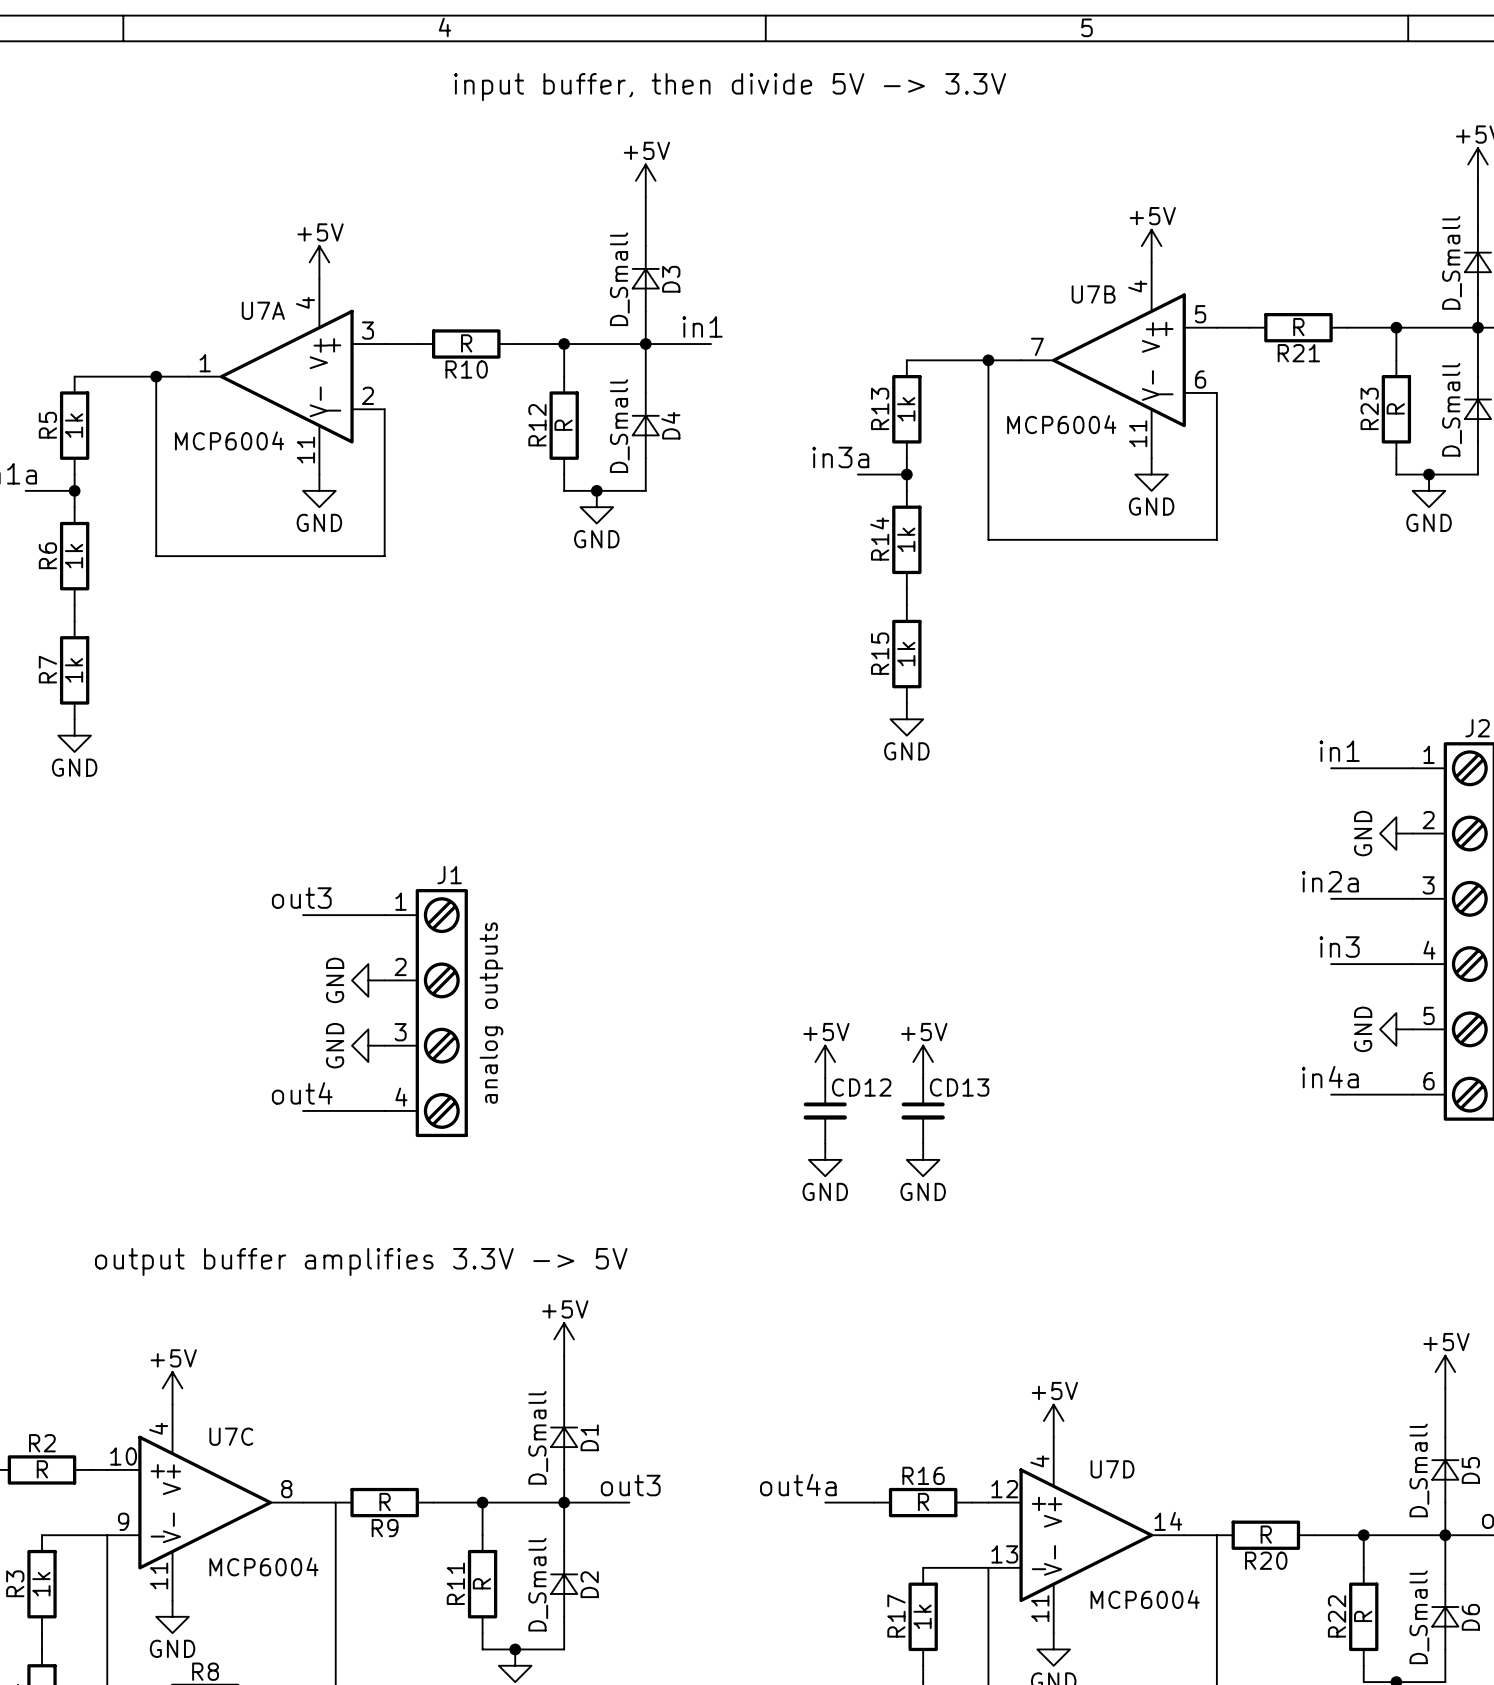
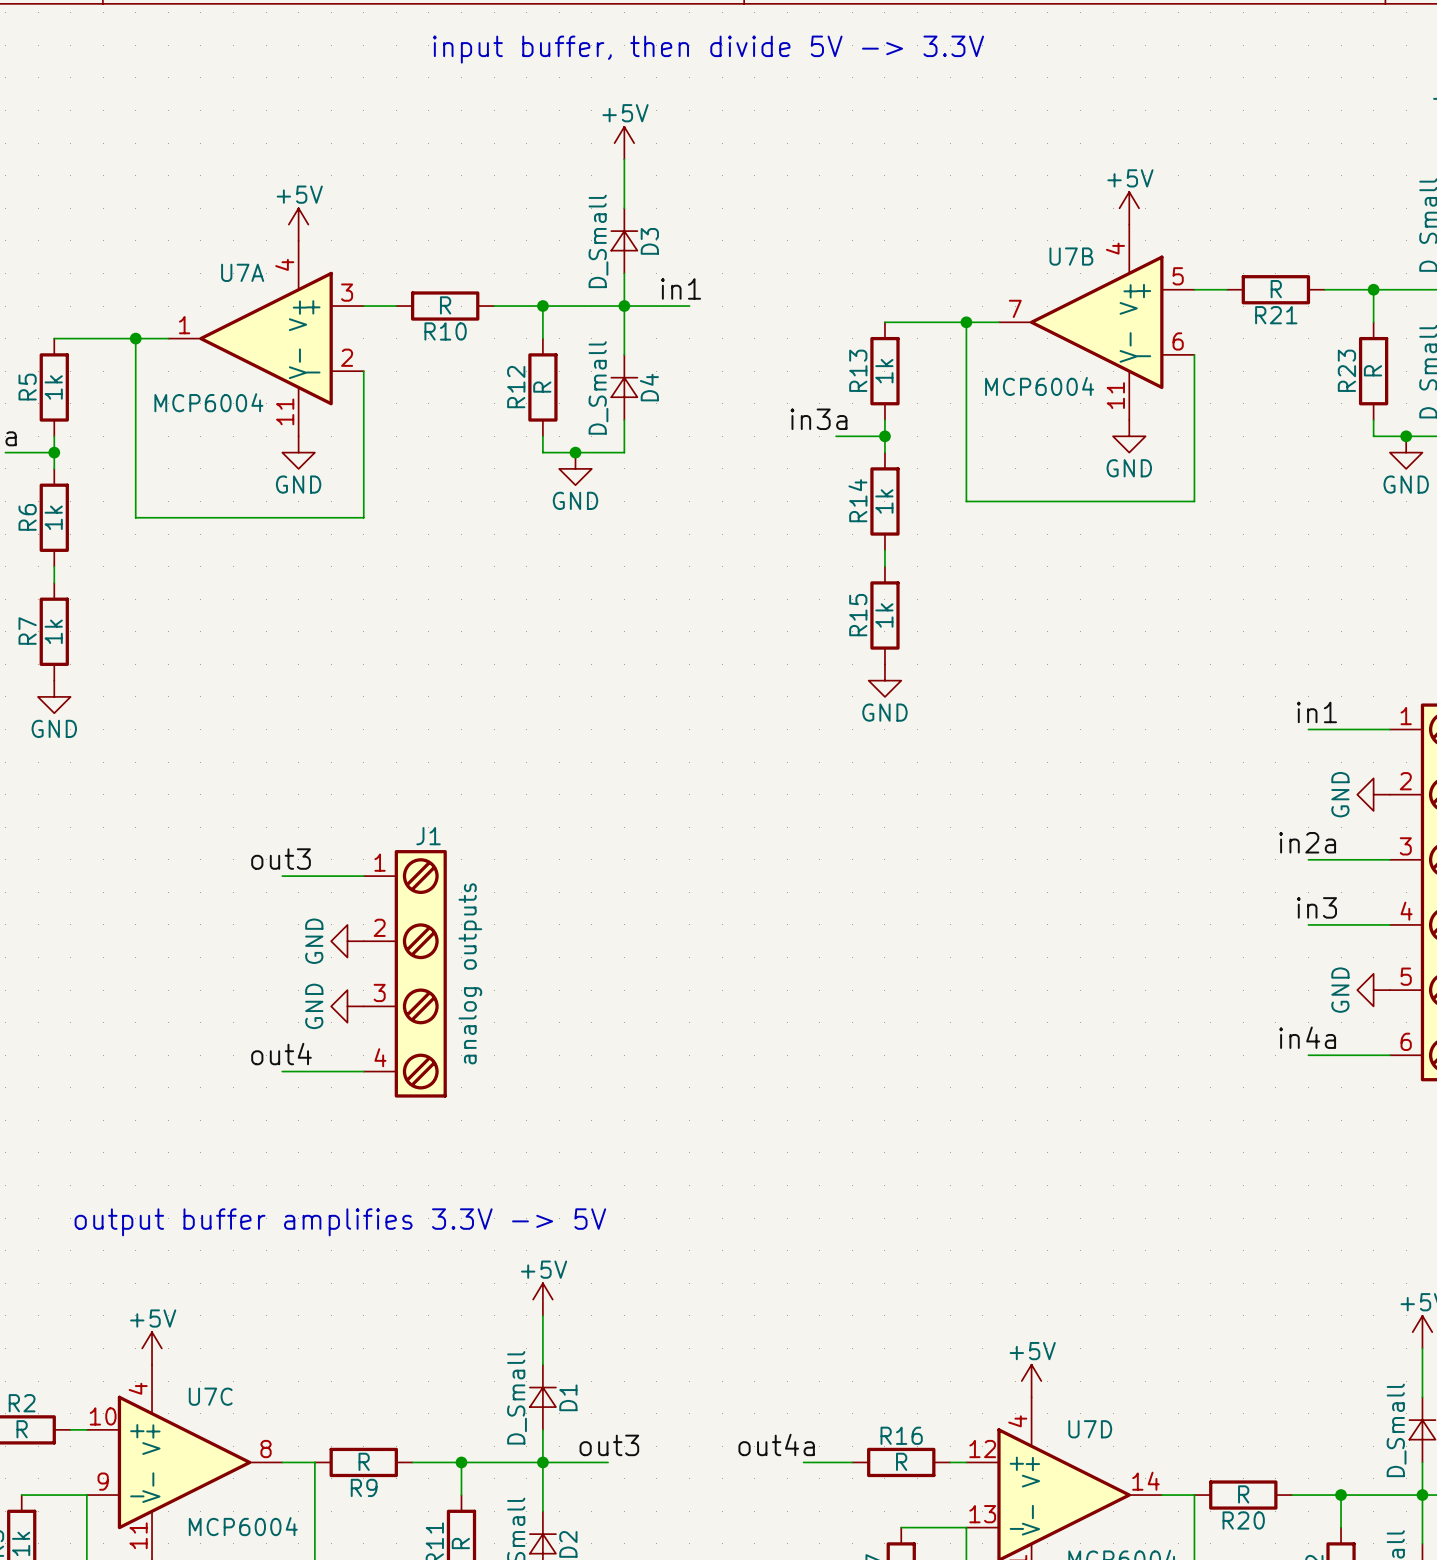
power symbol: +5V (825, 1062) -> none
power symbol: +5V (923, 1062) -> none
CD12: (825, 1110) -> none
CD13: (923, 1110) -> none
power symbol: GND (825, 1159) -> none
power symbol: GND (923, 1159) -> none

